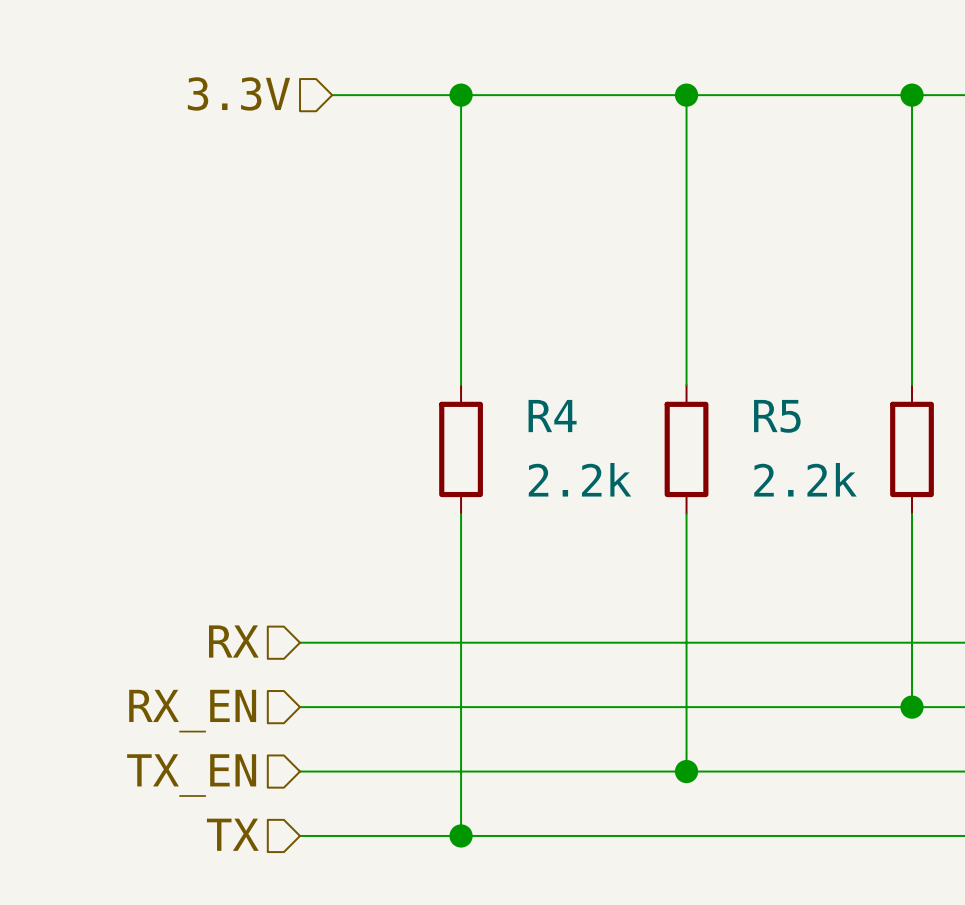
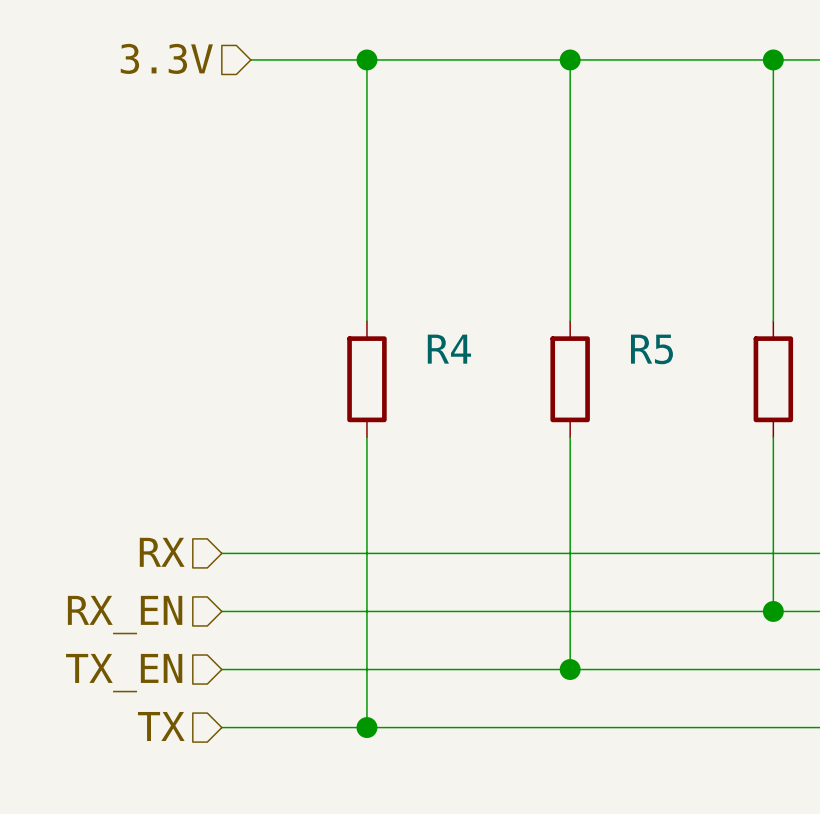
R4 value: 2.2k (579, 479) -> none
R5 value: 2.2k (805, 479) -> none

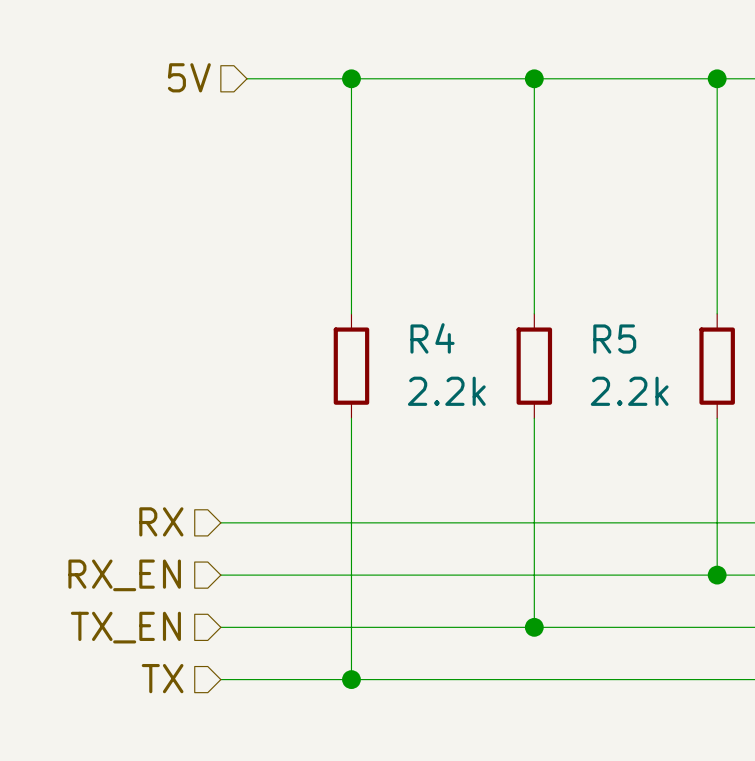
hierarchical label: 3.3V (166, 58) -> 5V (189, 77)
R4 value: none -> 2.2k (446, 391)
R5 value: none -> 2.2k (629, 391)

